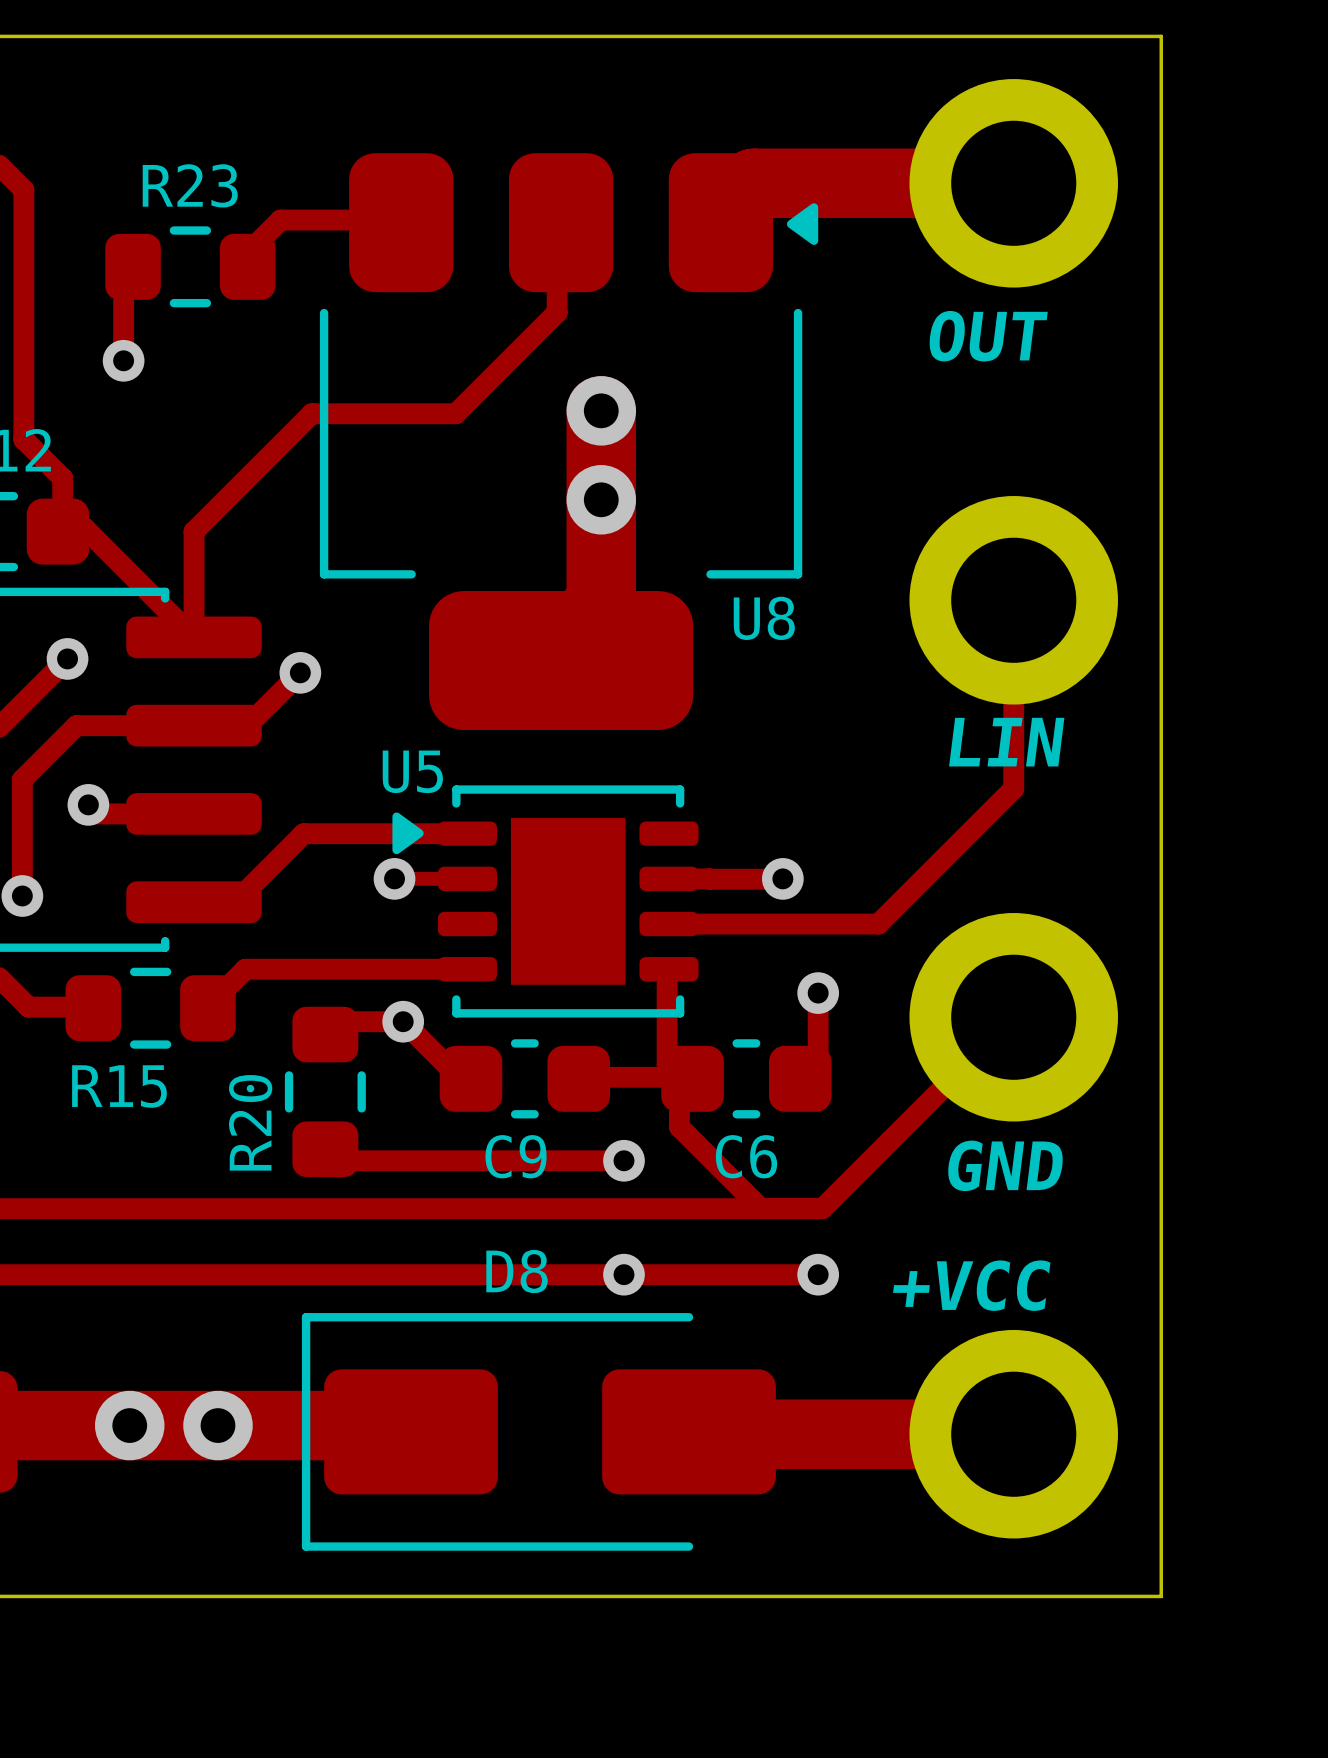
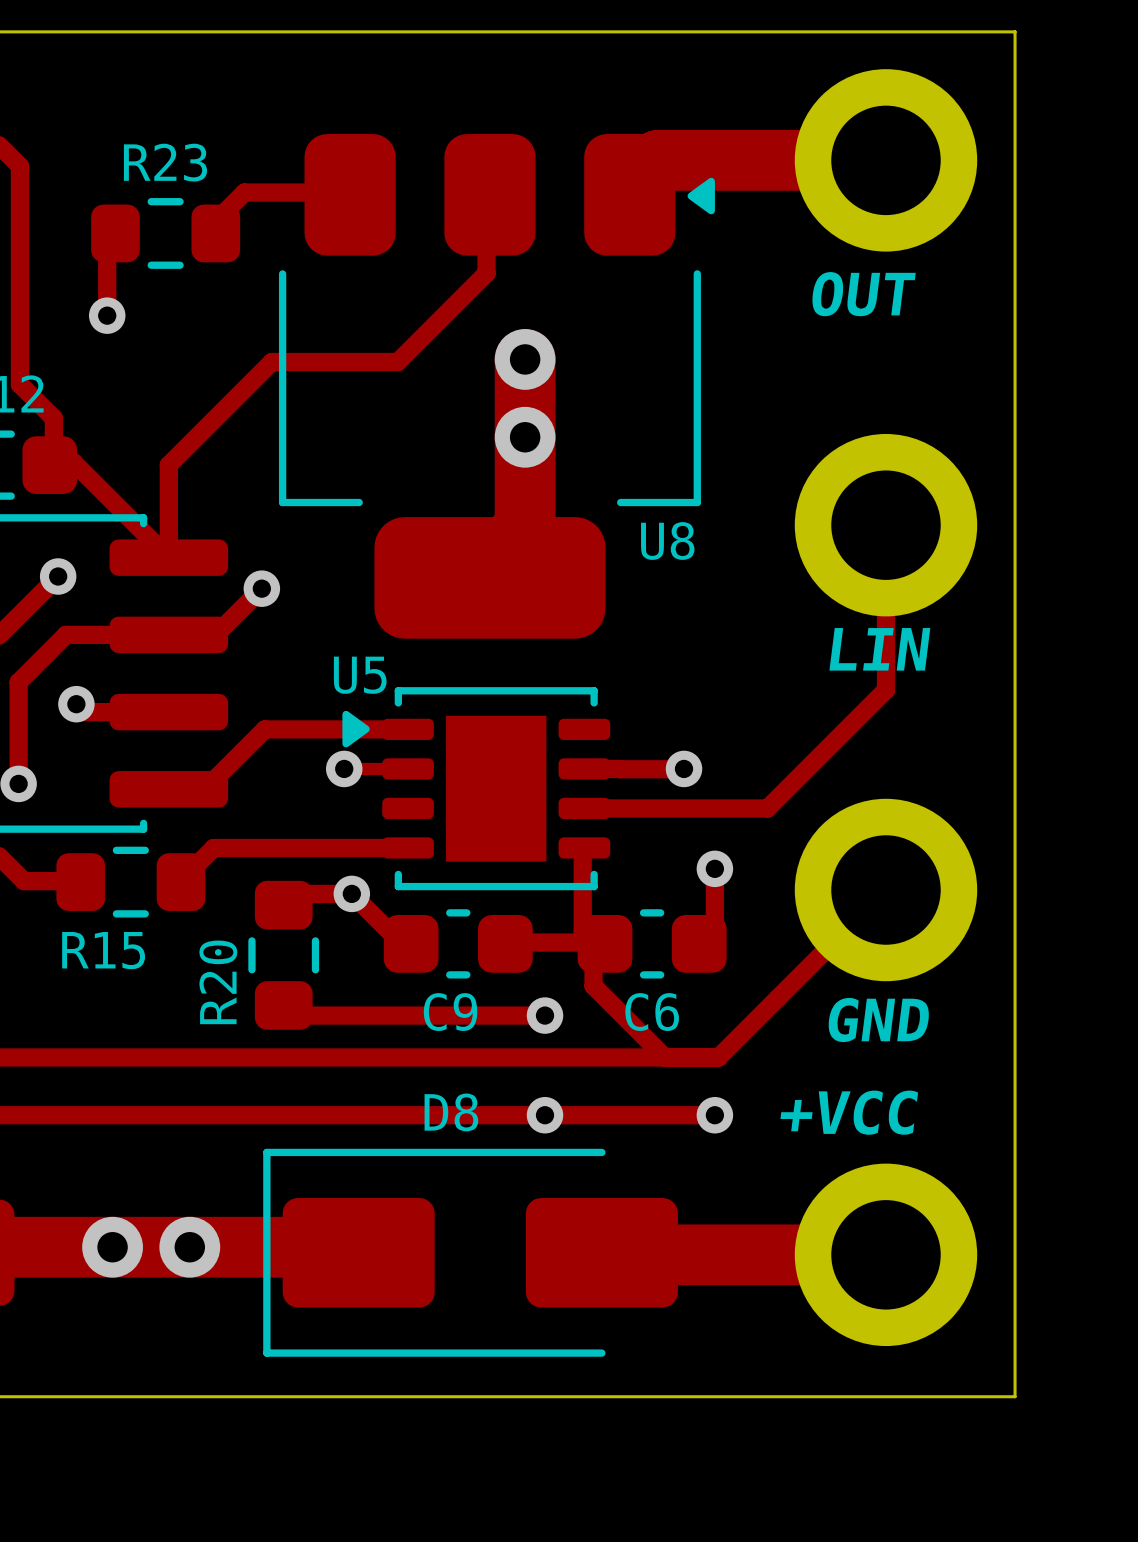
text position: +VCC (971, 1285) -> +VCC (849, 1112)

